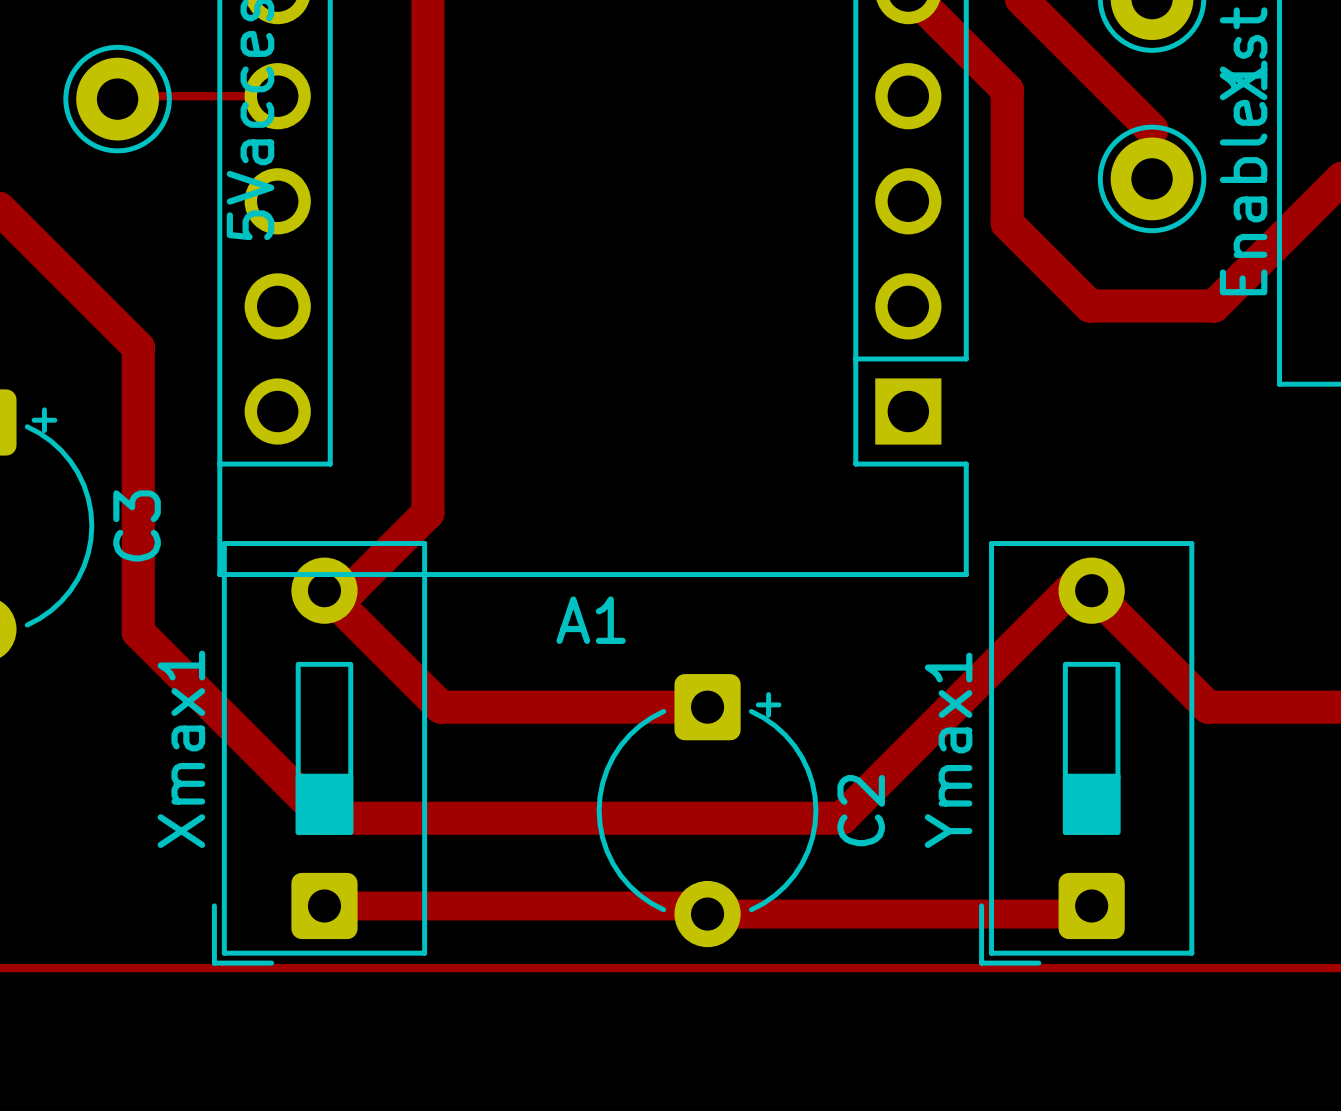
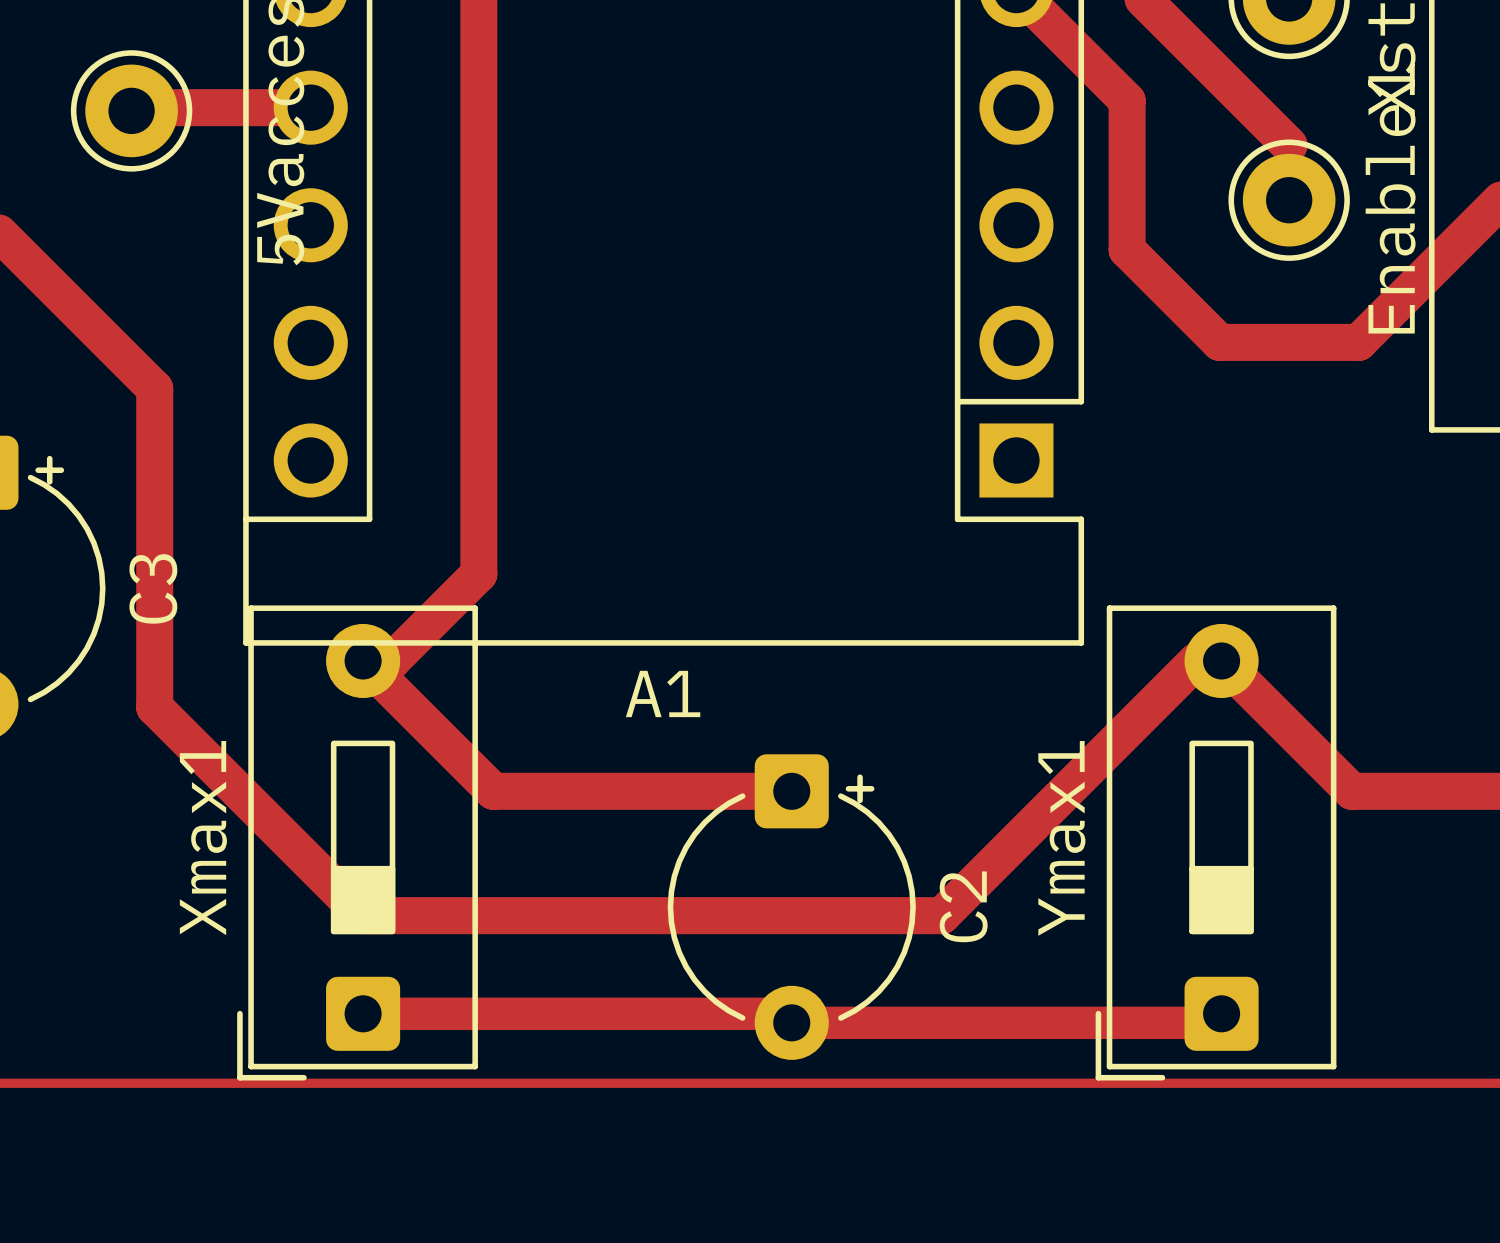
top track width: thin (141, 96) (277, 96) -> thick (157, 107) (310, 107)

